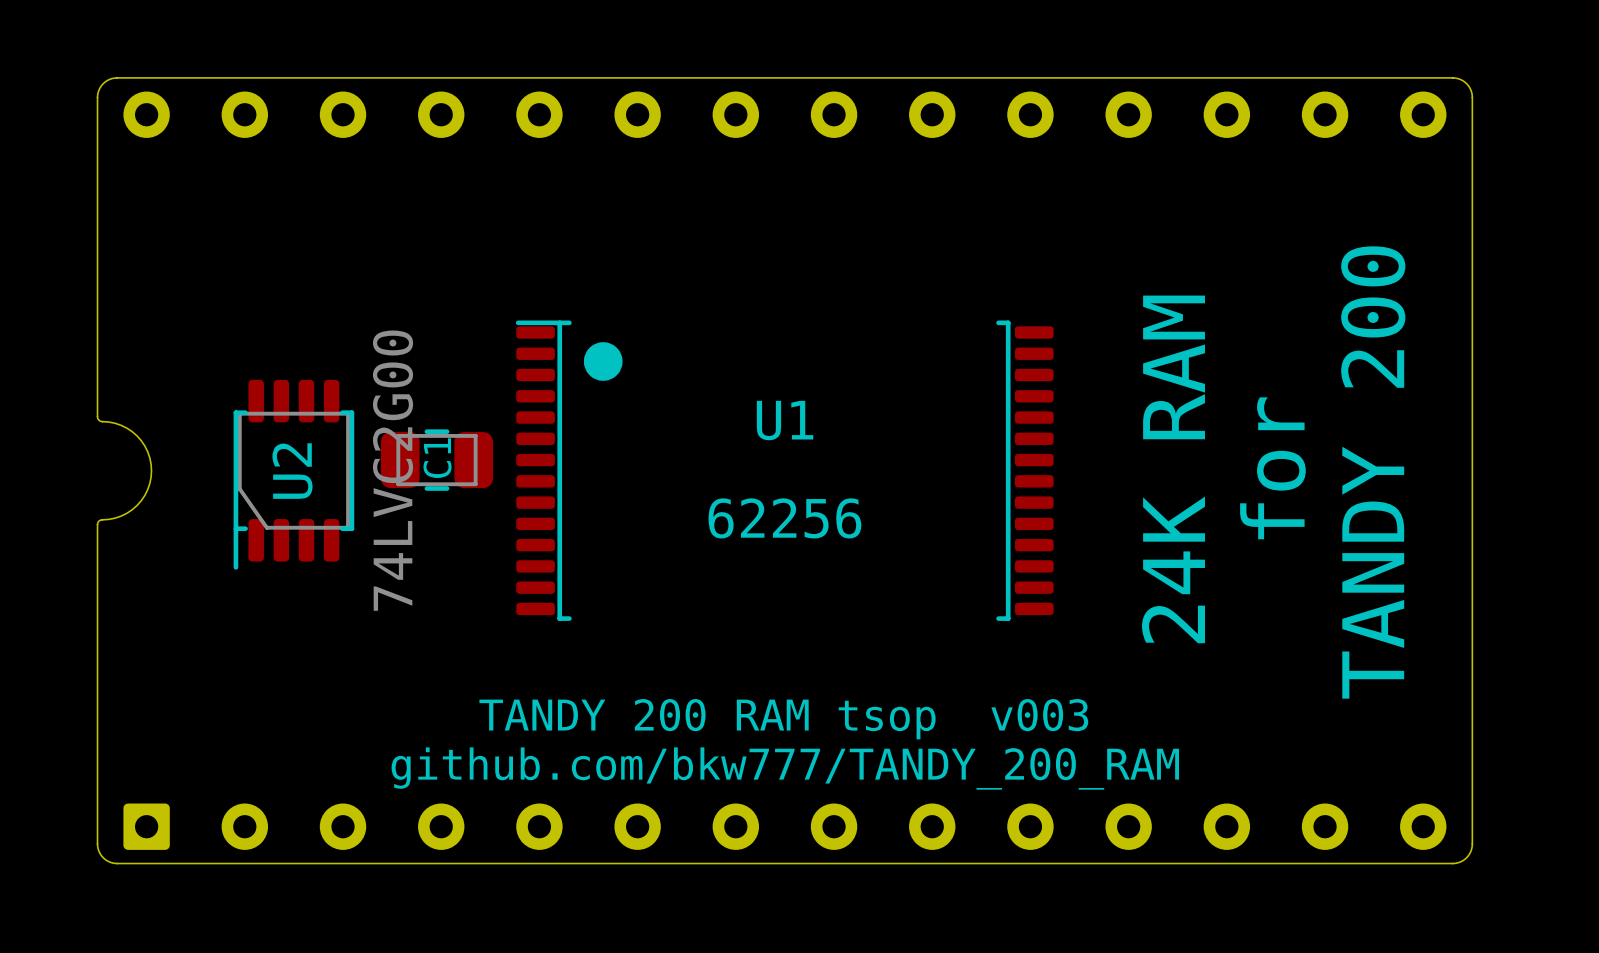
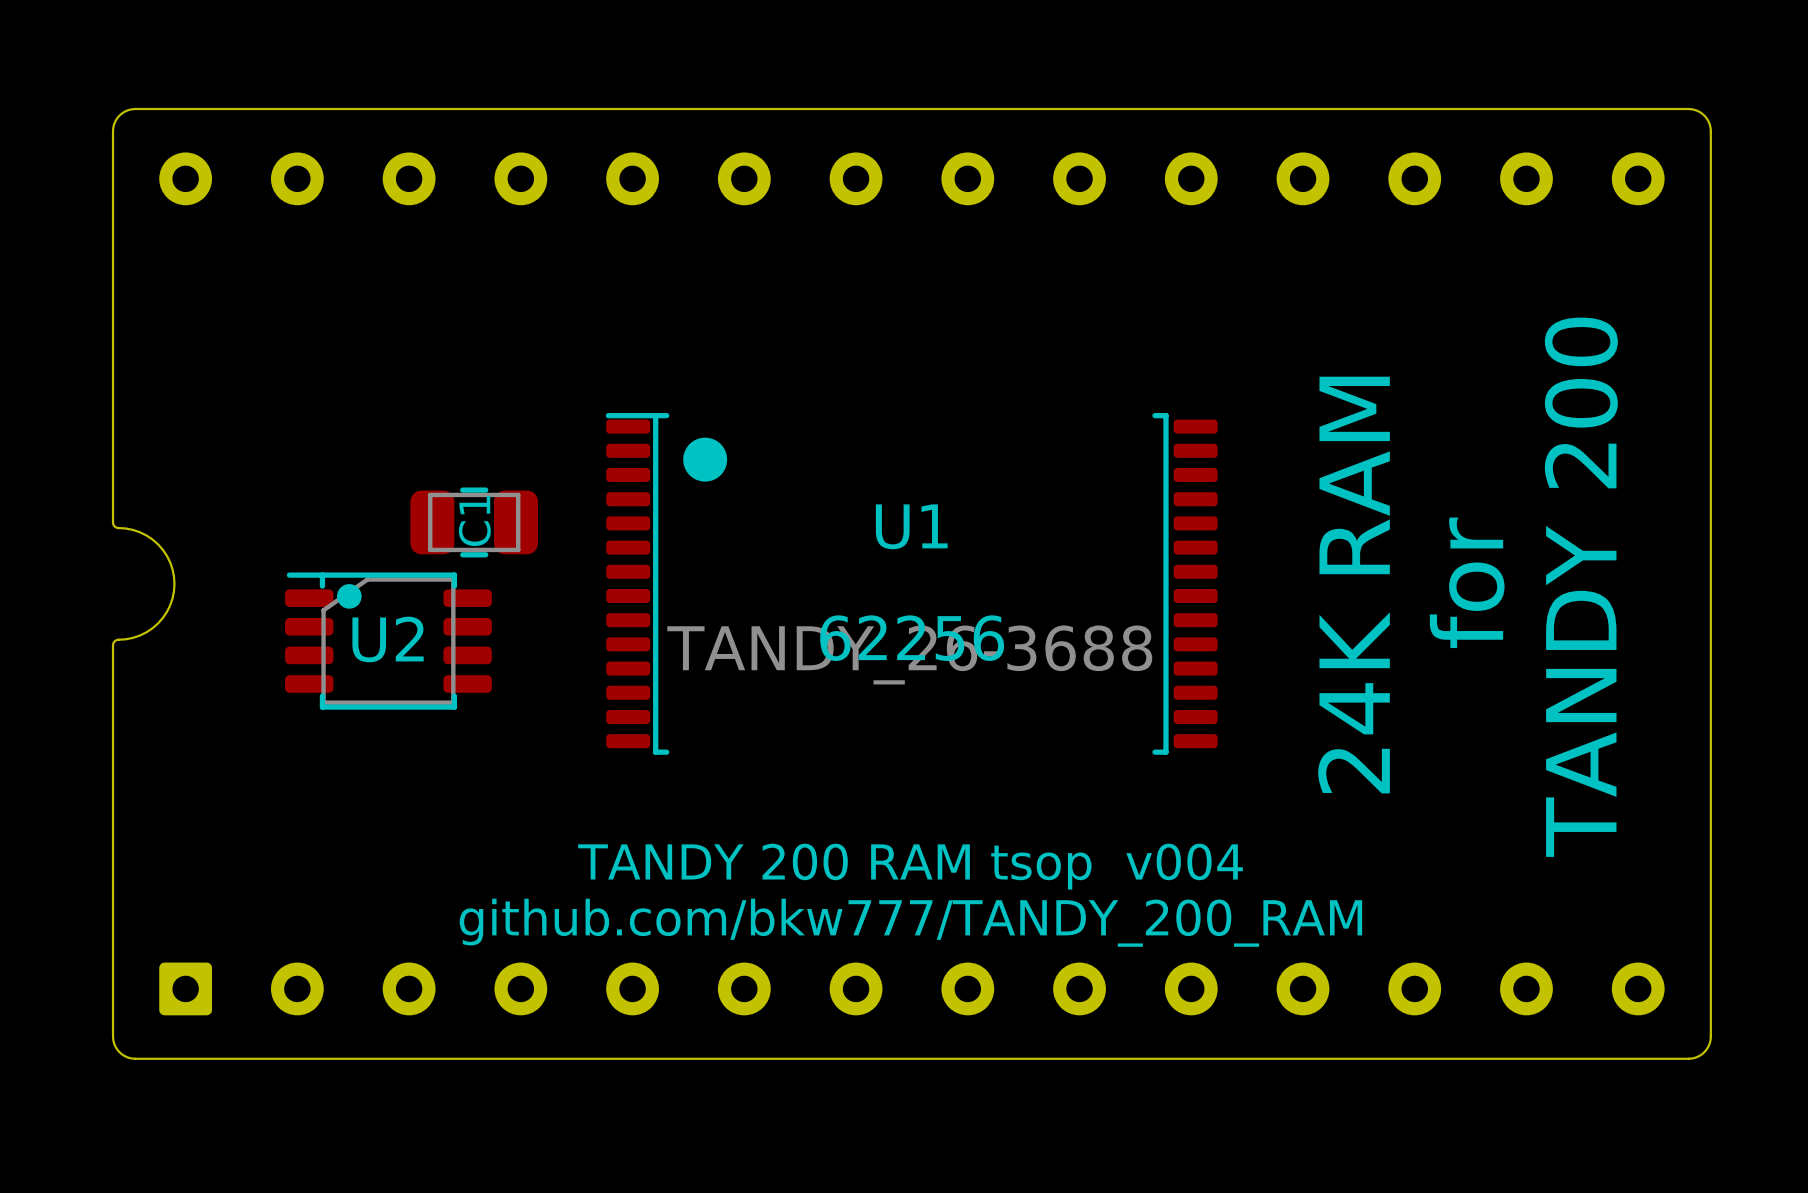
board edge: none -> (135, 109) (1688, 109) (1699, 112) (1707, 120) (1710, 131) (1710, 1036) (1707, 1047) (1699, 1055) (1688, 1058) (135, 1058) (124, 1055) (116, 1047) (113, 1036) (113, 644) (116, 640) (139, 635) (158, 623) (170, 605) (174, 583) (170, 562) (158, 544) (139, 532) (116, 527) (113, 523) (113, 131) (114, 122) (119, 115) (126, 110) (135, 109)
part footprint: [97, 77, 1473, 864] -> [159, 152, 1665, 1016]
U2 footprint: [233, 379, 355, 570] -> [285, 572, 492, 710]
C1 position: (436, 460) -> (474, 522)
U2 value: 74LVC2G00 (393, 470) -> none
part value: none -> TANDY_26-3688 (909, 654)
text: TANDY 200 RAM tsop v003 (783, 719) -> TANDY 200 RAM tsop v004 (910, 866)

